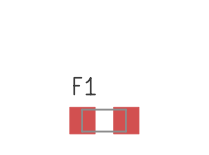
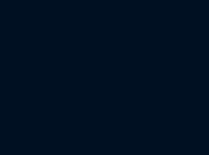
F1: (104, 120) -> none

